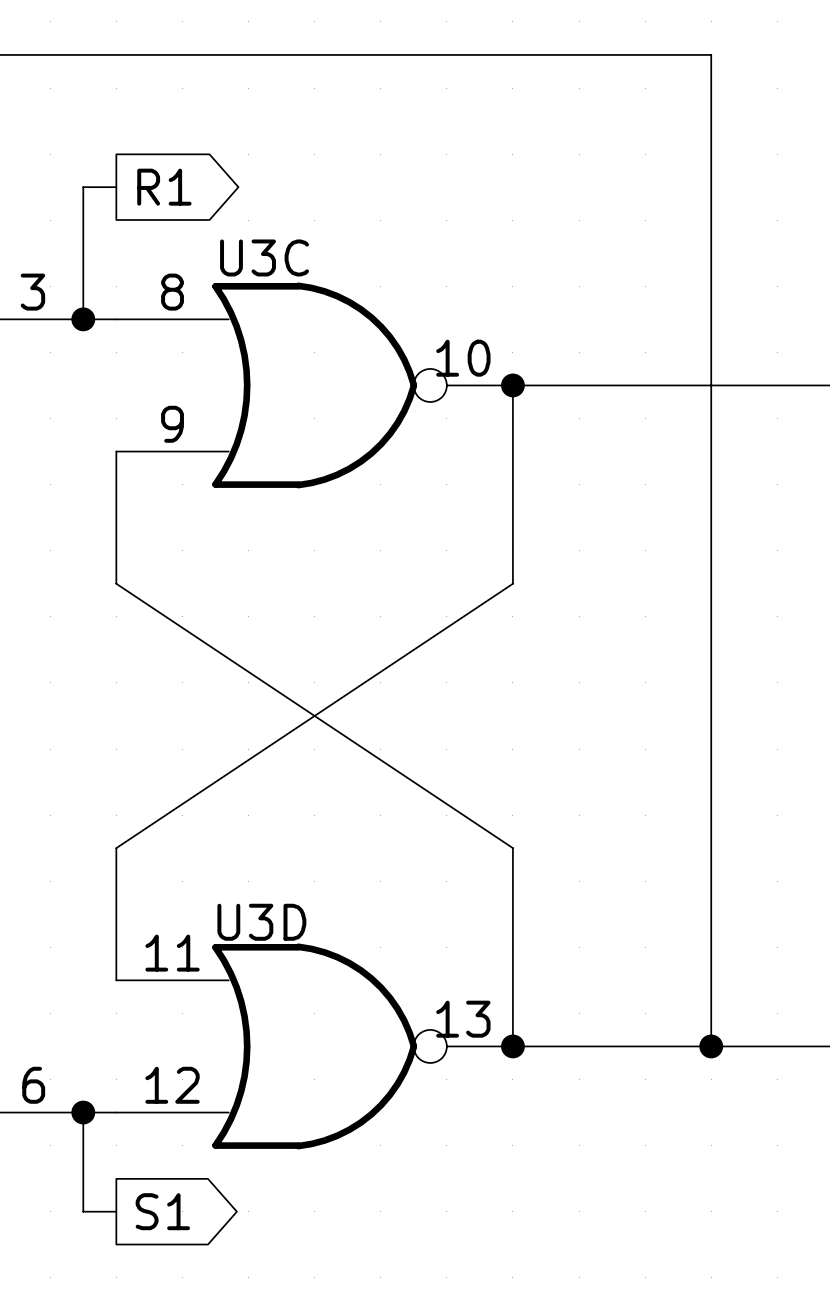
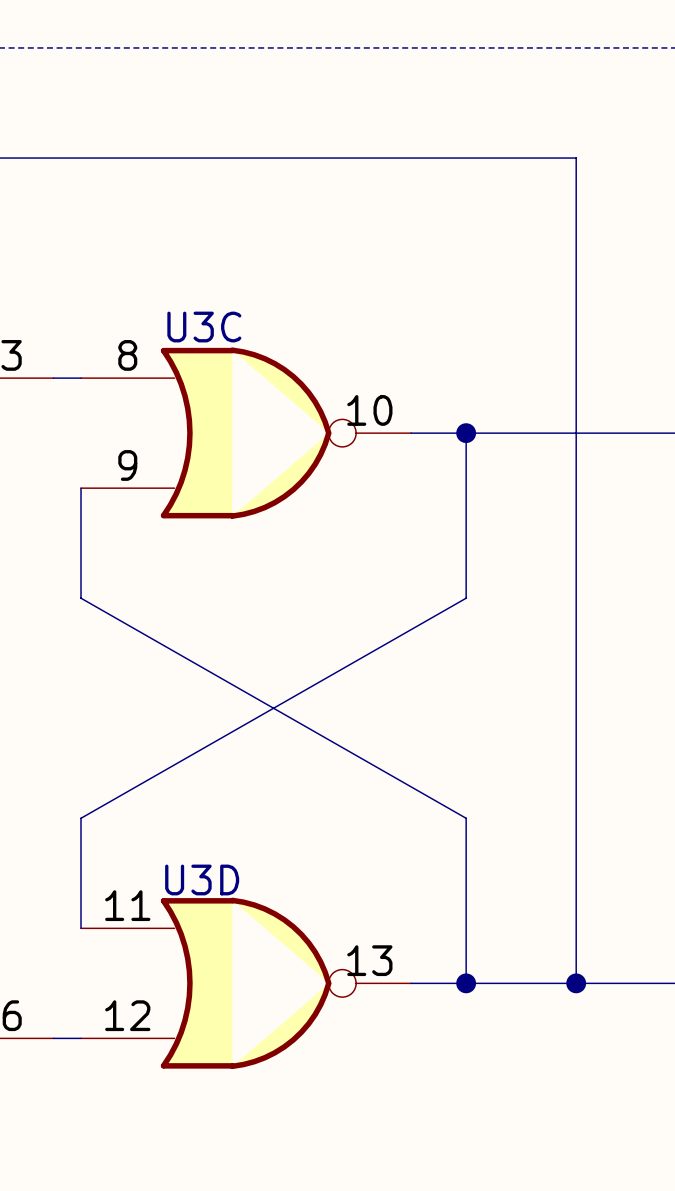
wire: (116, 187) (83, 187) (83, 319) -> none
global label: R1 (164, 187) -> none
junction: (83, 319) -> none
wire: (512, 385) (512, 583) (116, 848) -> (466, 433) (466, 598) (81, 818)
junction position: (512, 385) -> (466, 433)
wire: (116, 583) (512, 848) (512, 1046) -> (81, 598) (466, 818) (466, 983)
junction position: (512, 1046) -> (466, 983)
wire: (83, 1112) (83, 1211) (116, 1211) -> none
junction: (83, 1112) -> none
global label: S1 (162, 1211) -> none

